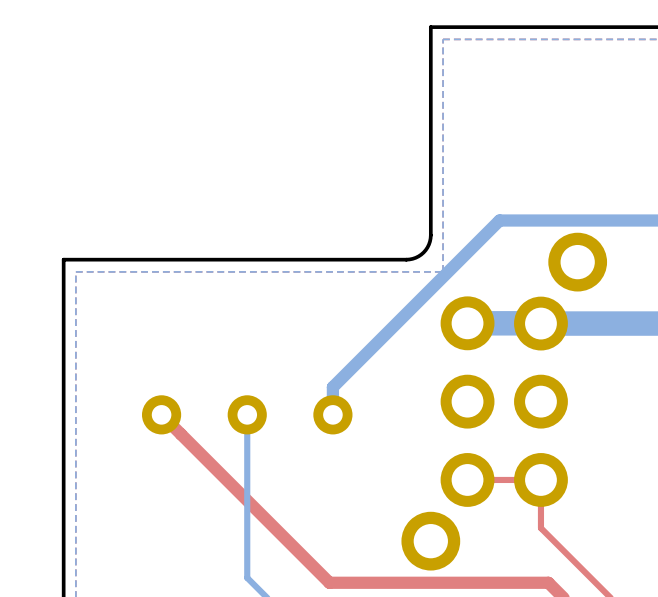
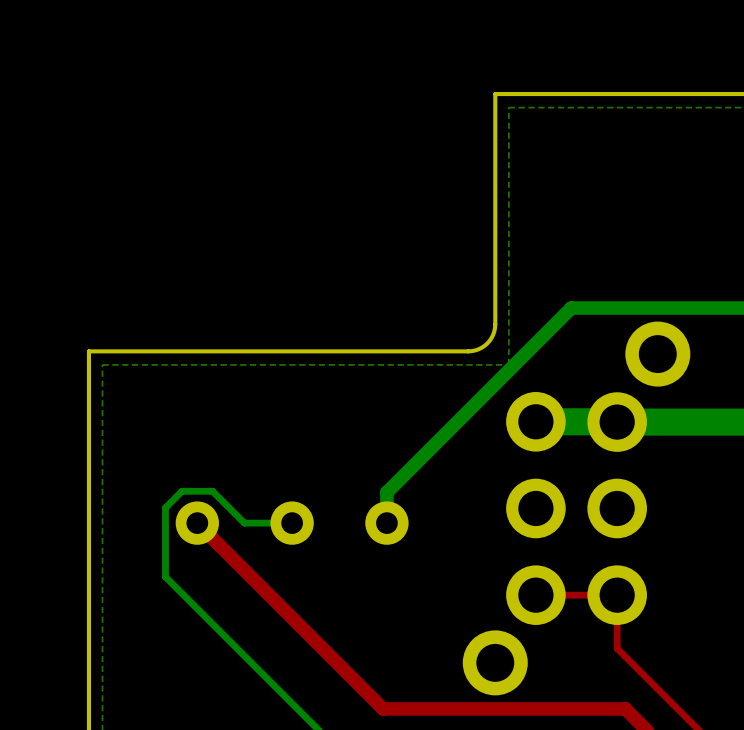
bottom track: (247, 414) (247, 577) -> (292, 523) (244, 523) (212, 491) (182, 491) (165, 507) (165, 576) (292, 703)

